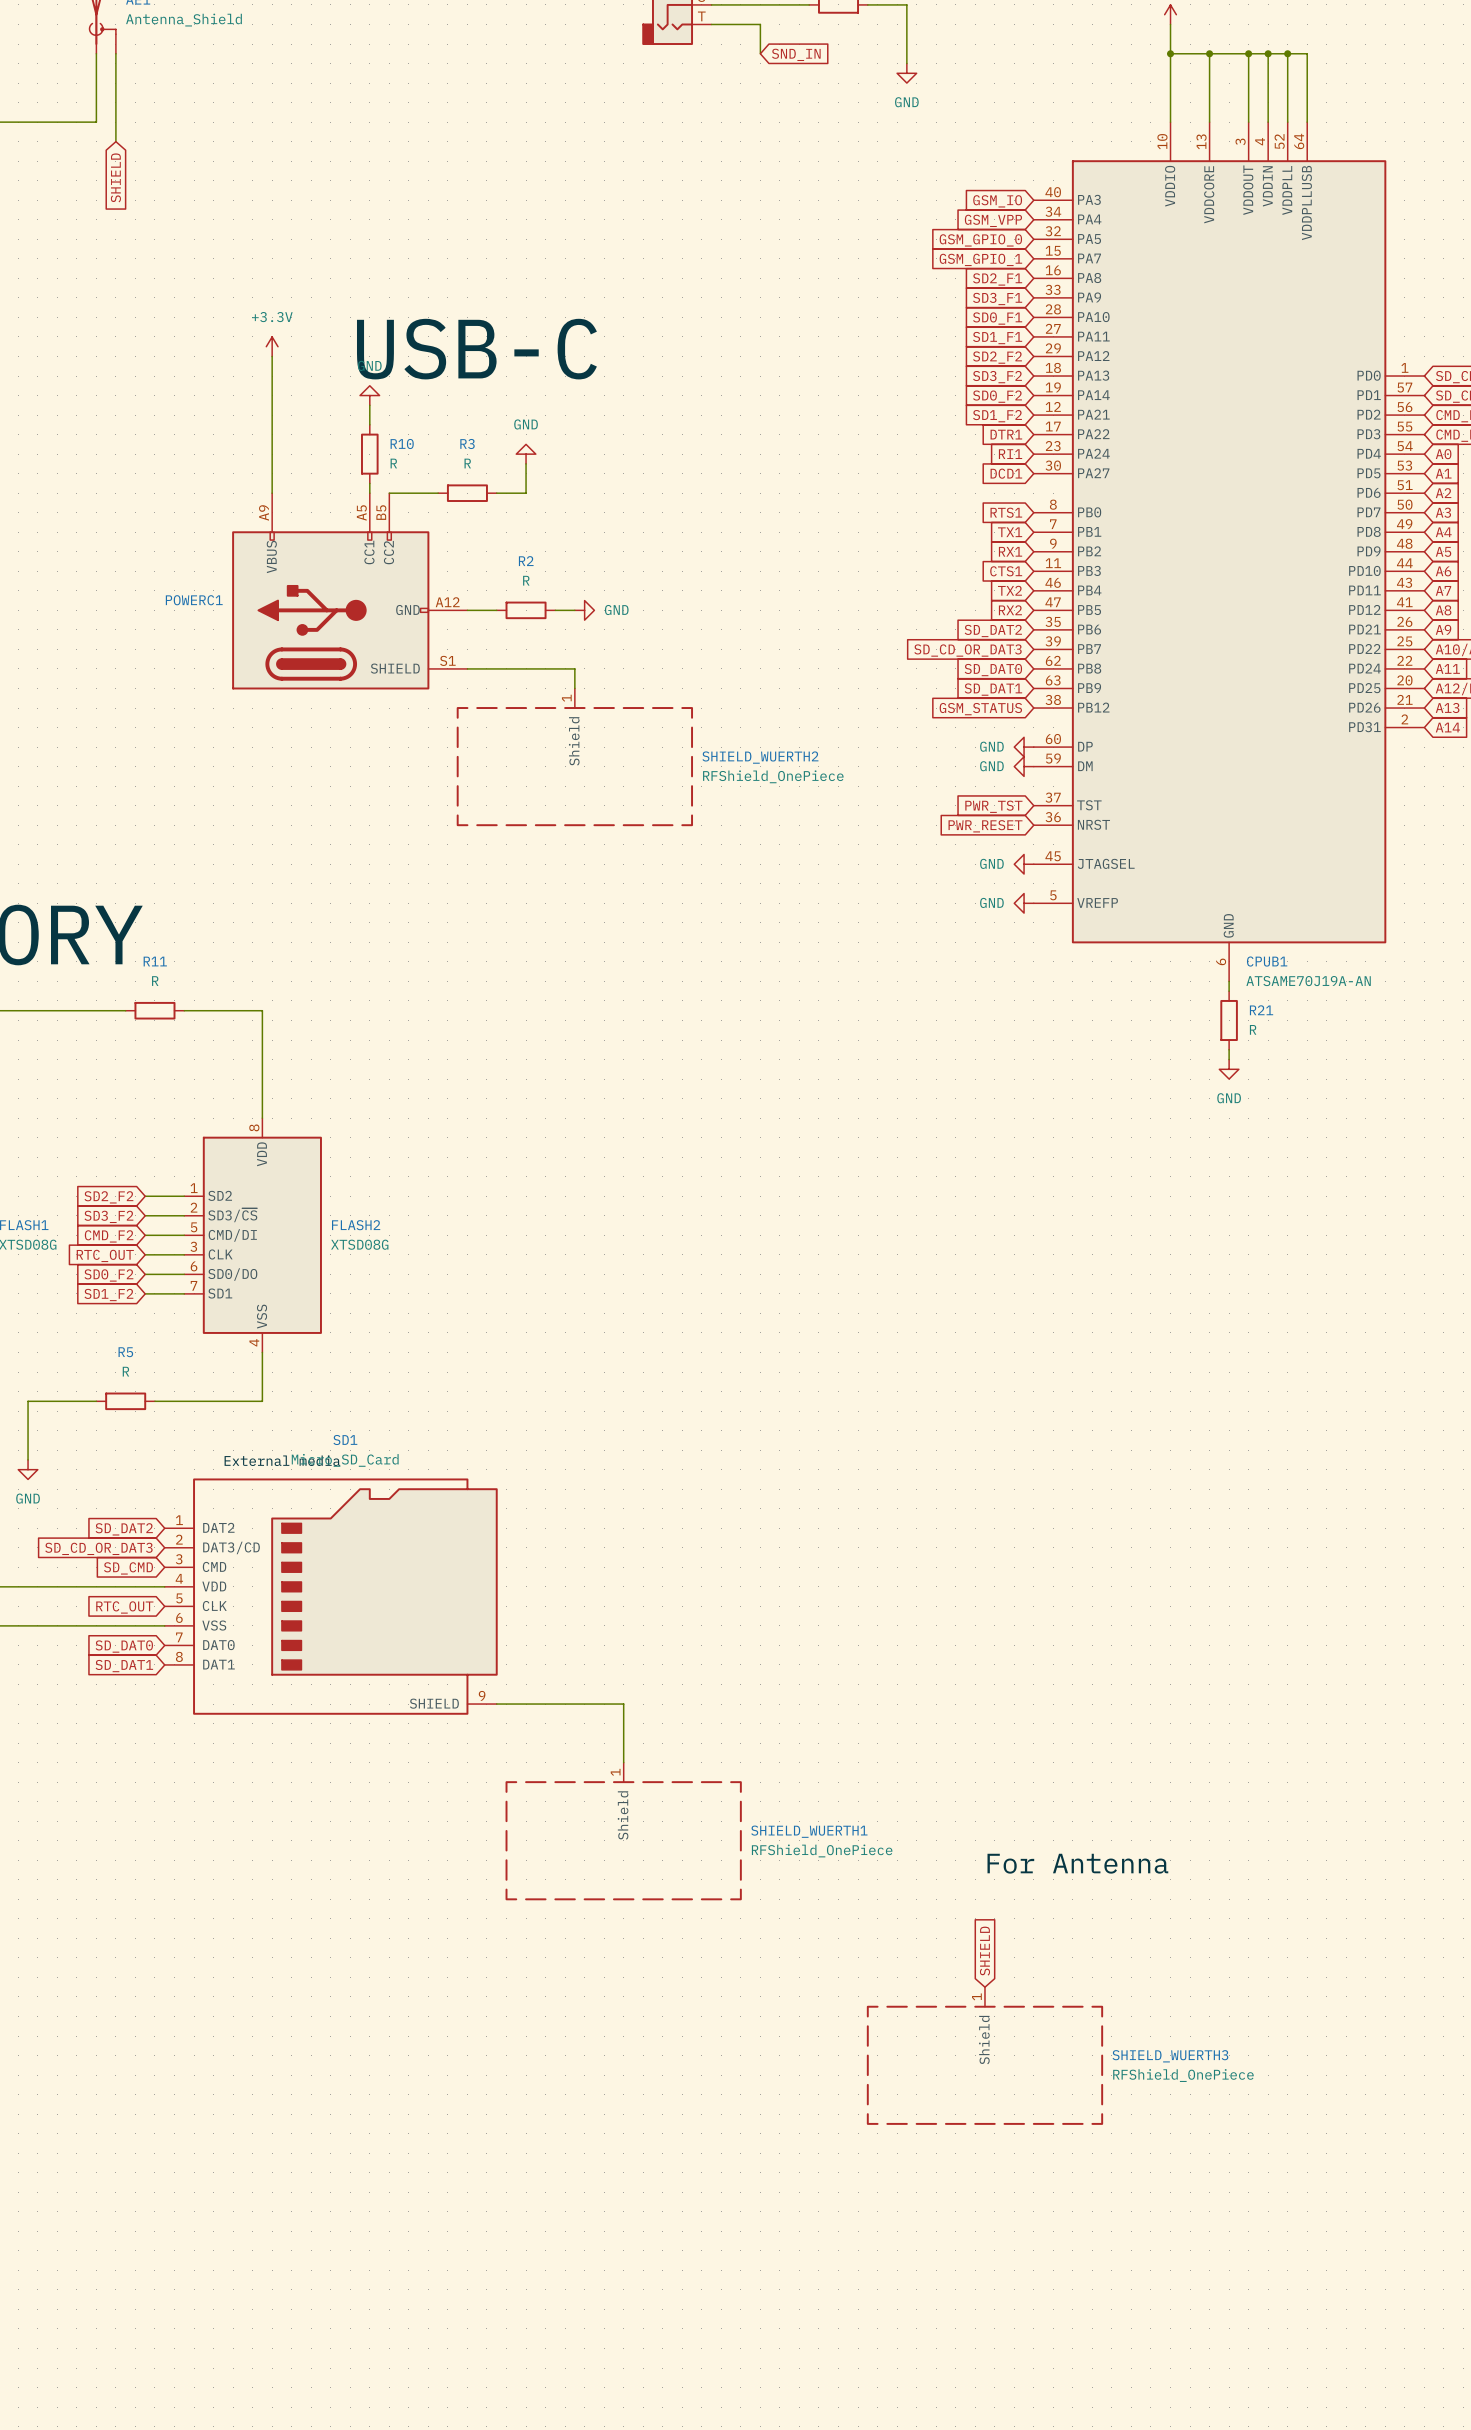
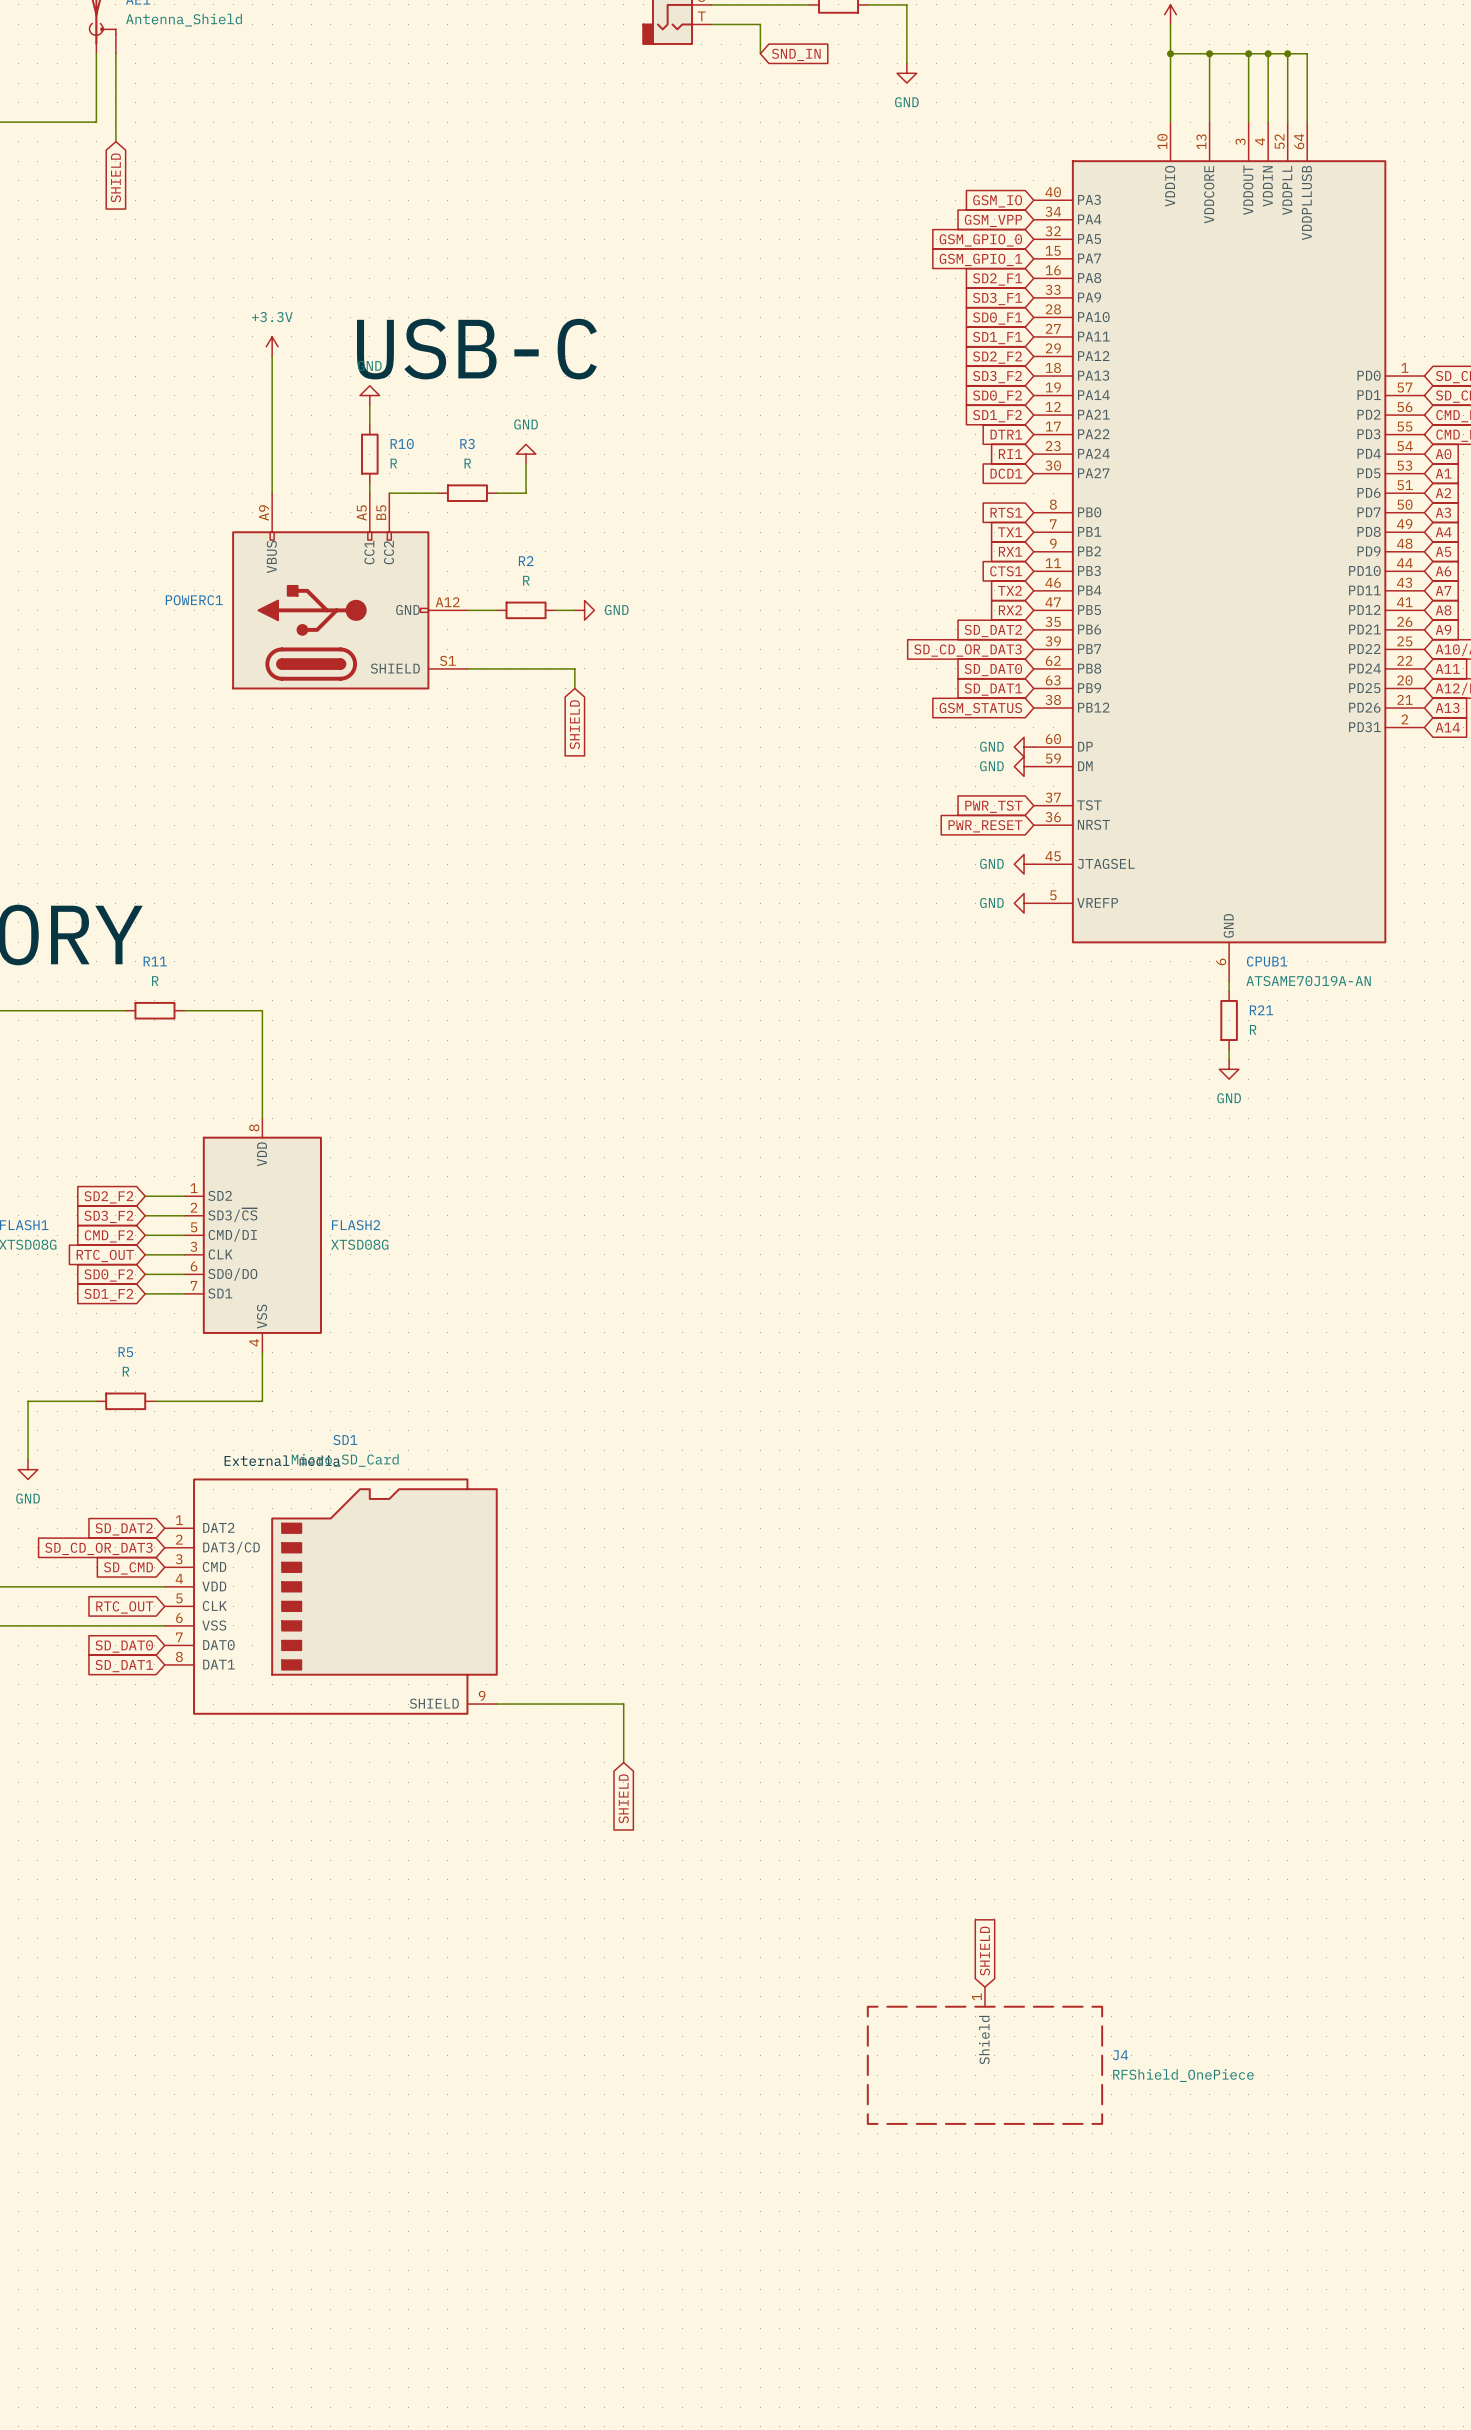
global label: none -> SHIELD (574, 724)
SHIELD_WUERTH2: RFShield_OnePiece (574, 757) -> none
global label: none -> SHIELD (623, 1798)
SHIELD_WUERTH1: RFShield_OnePiece (623, 1831) -> none
label: For Antenna (1077, 1863) -> none
SHIELD_WUERTH3 name: SHIELD_WUERTH3 (1170, 2056) -> J4 (1120, 2055)

